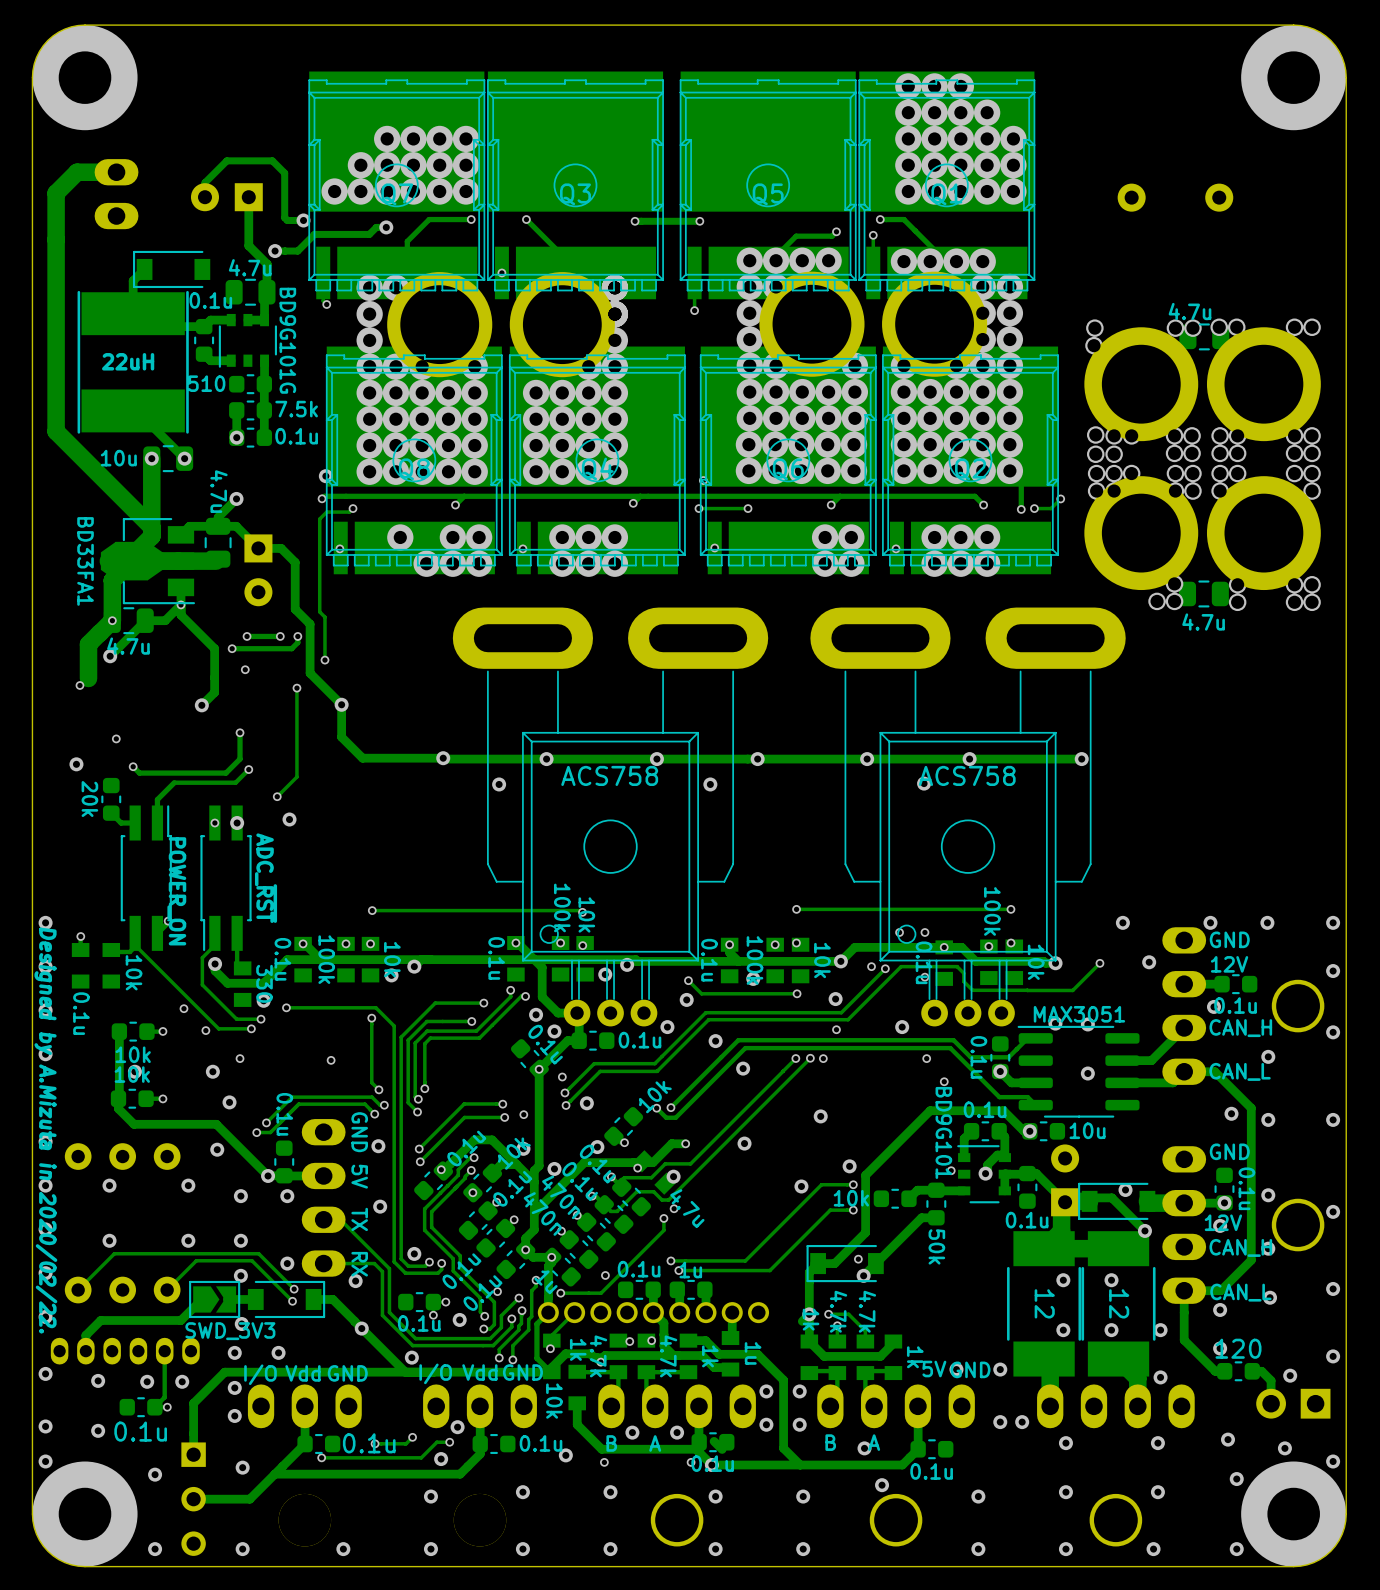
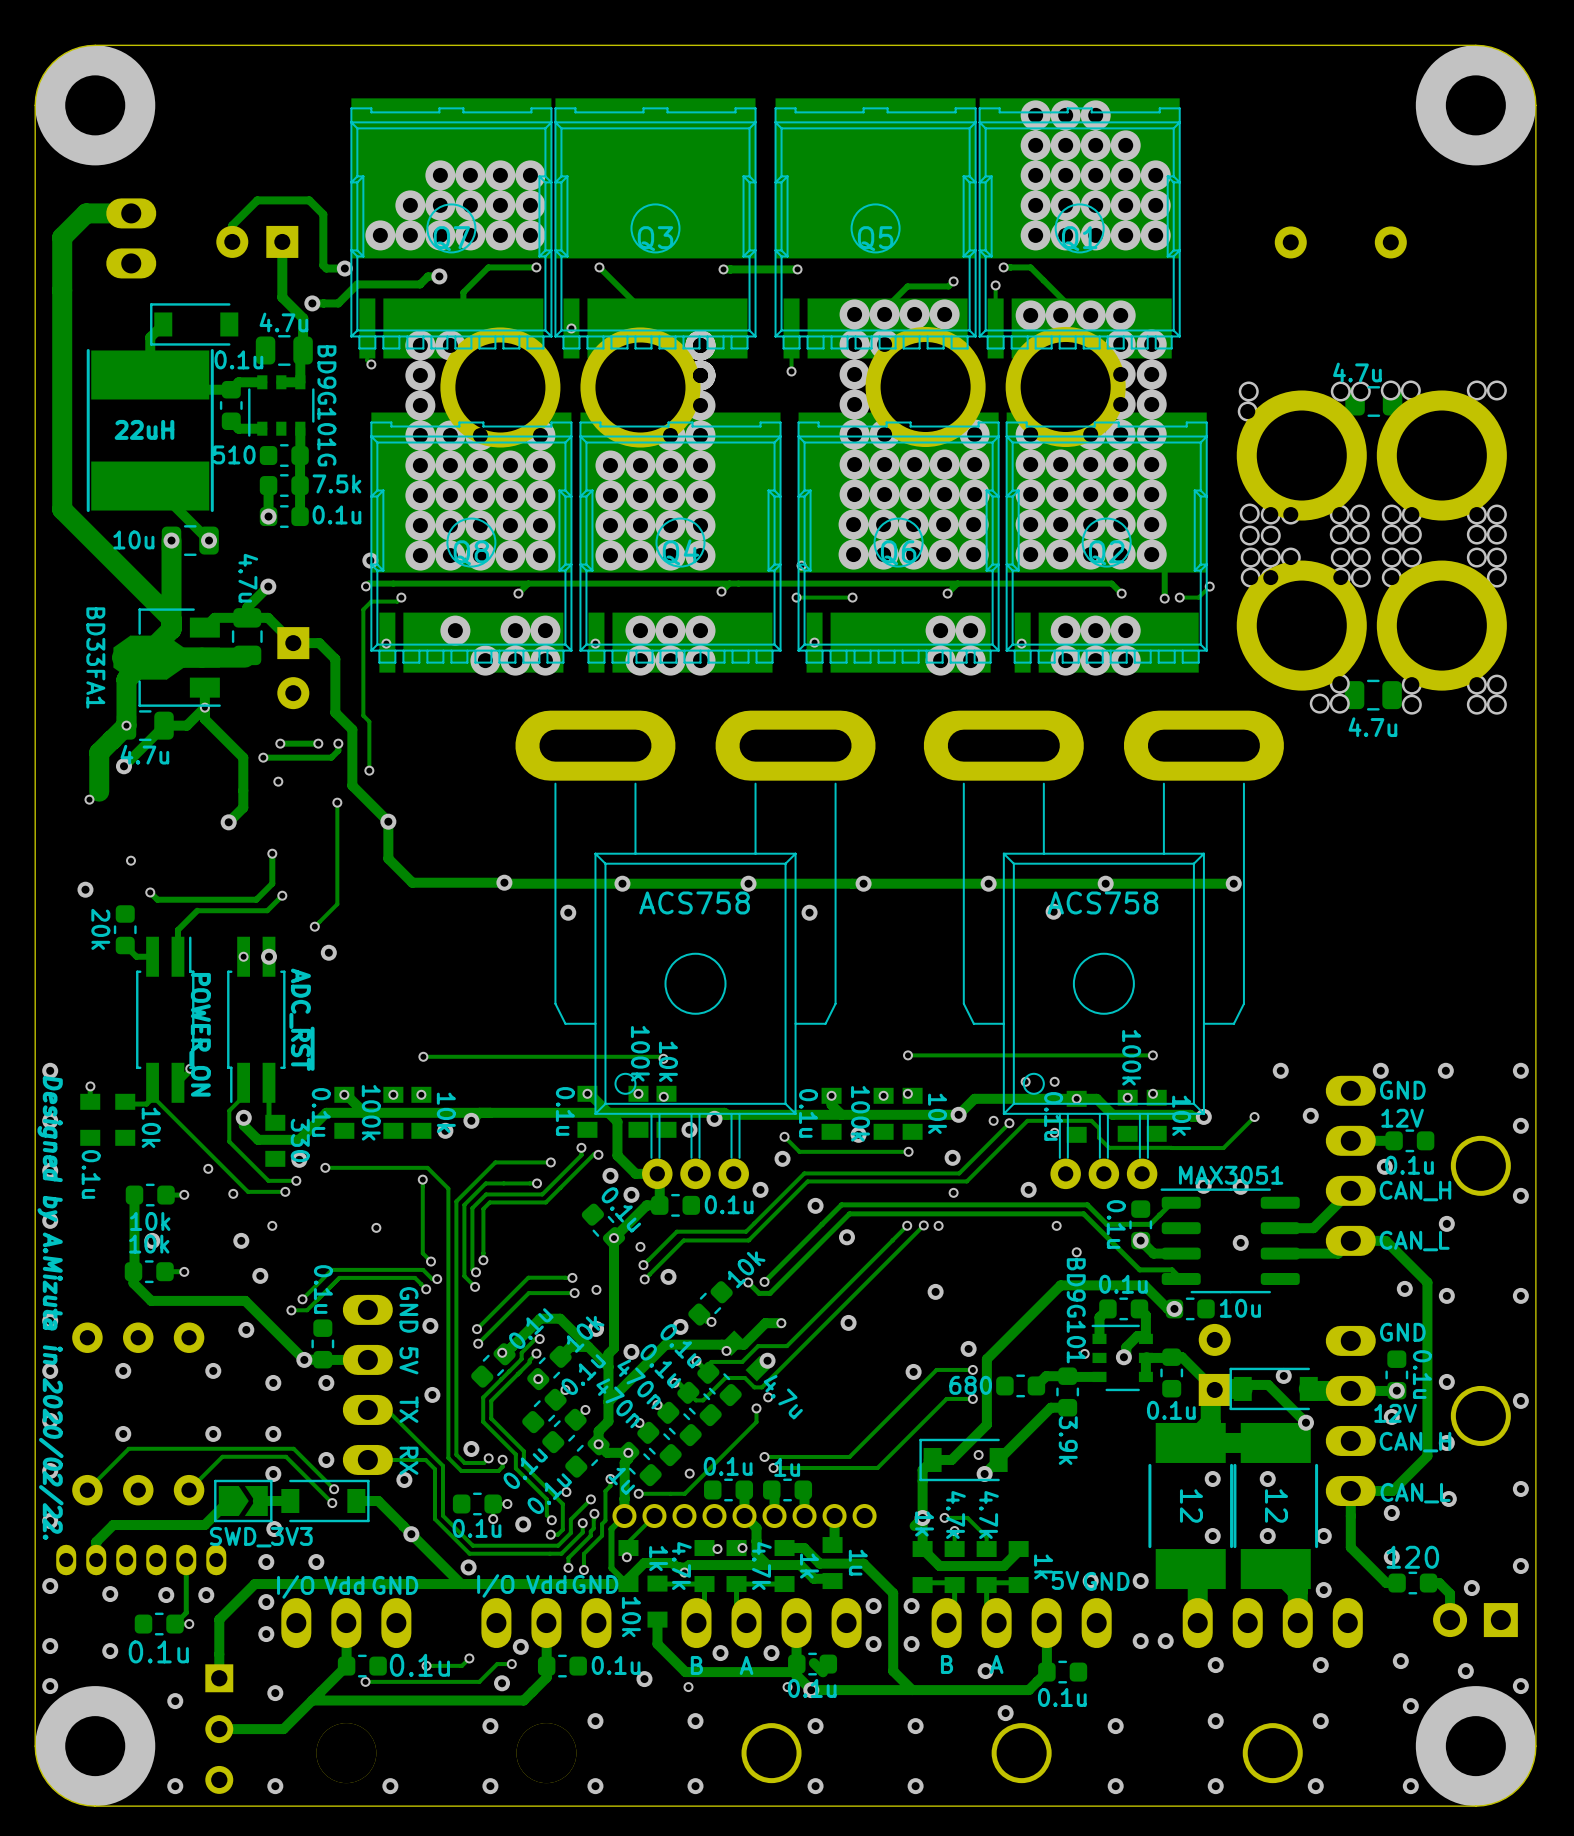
part value: 10k (851, 1198) -> 680 (970, 1385)
part value: 50k (936, 1246) -> 3.9k (1068, 1440)

